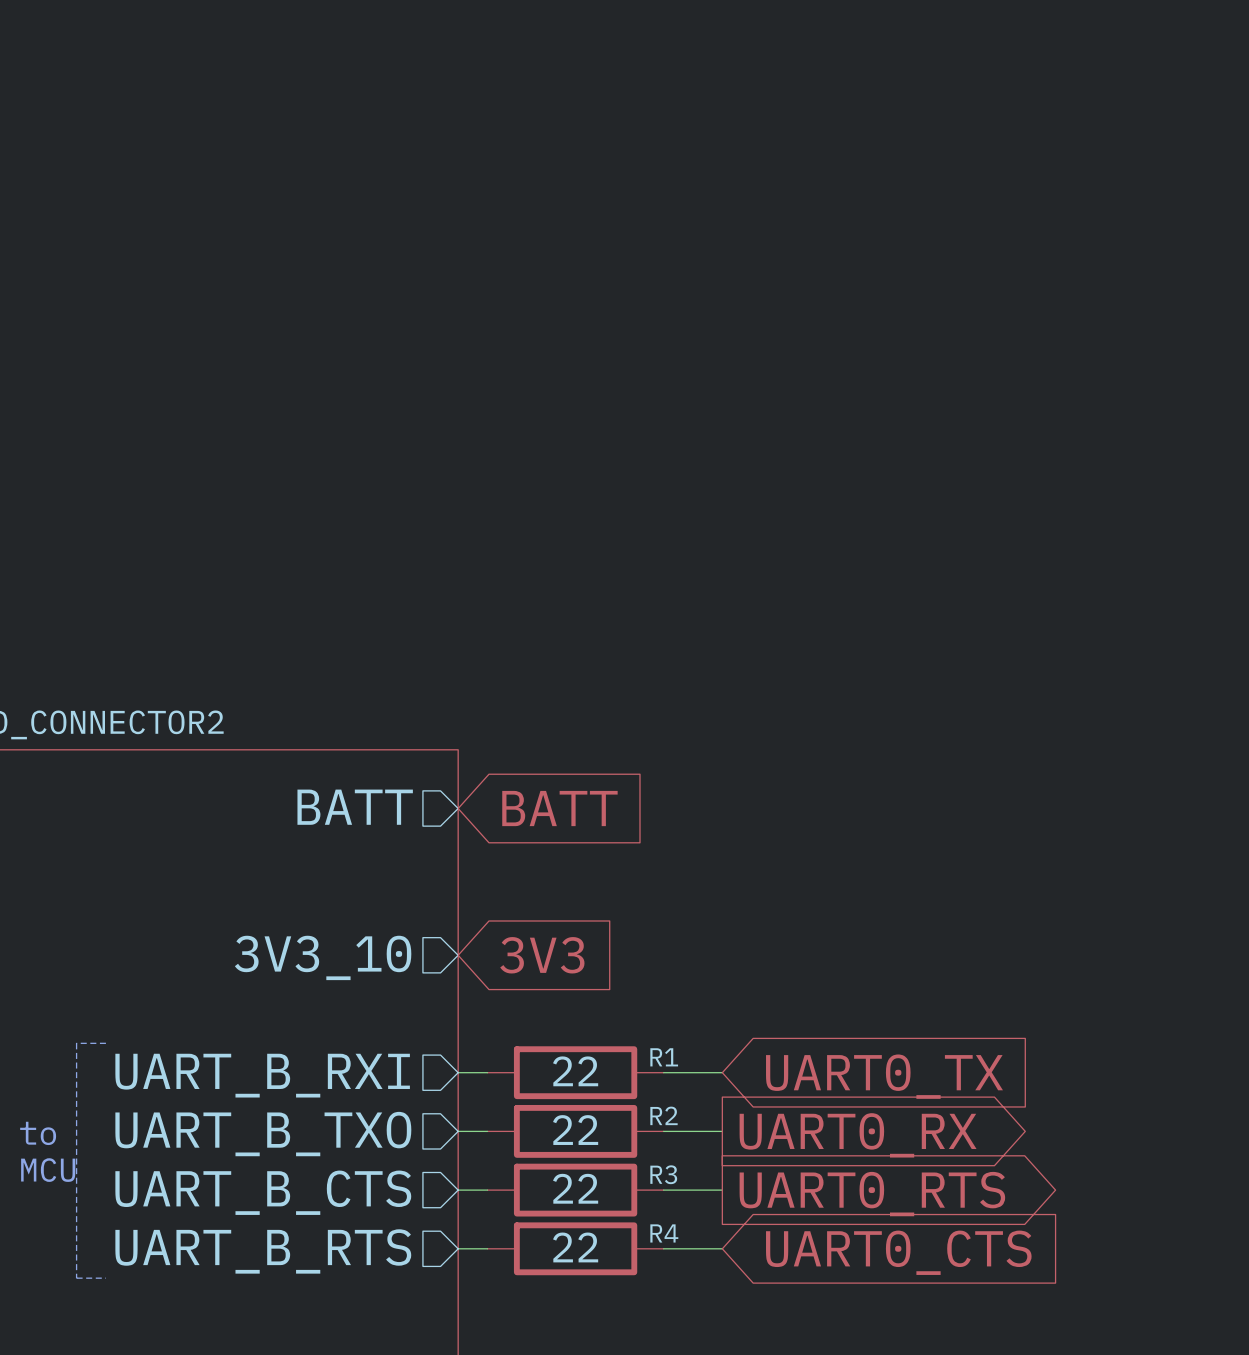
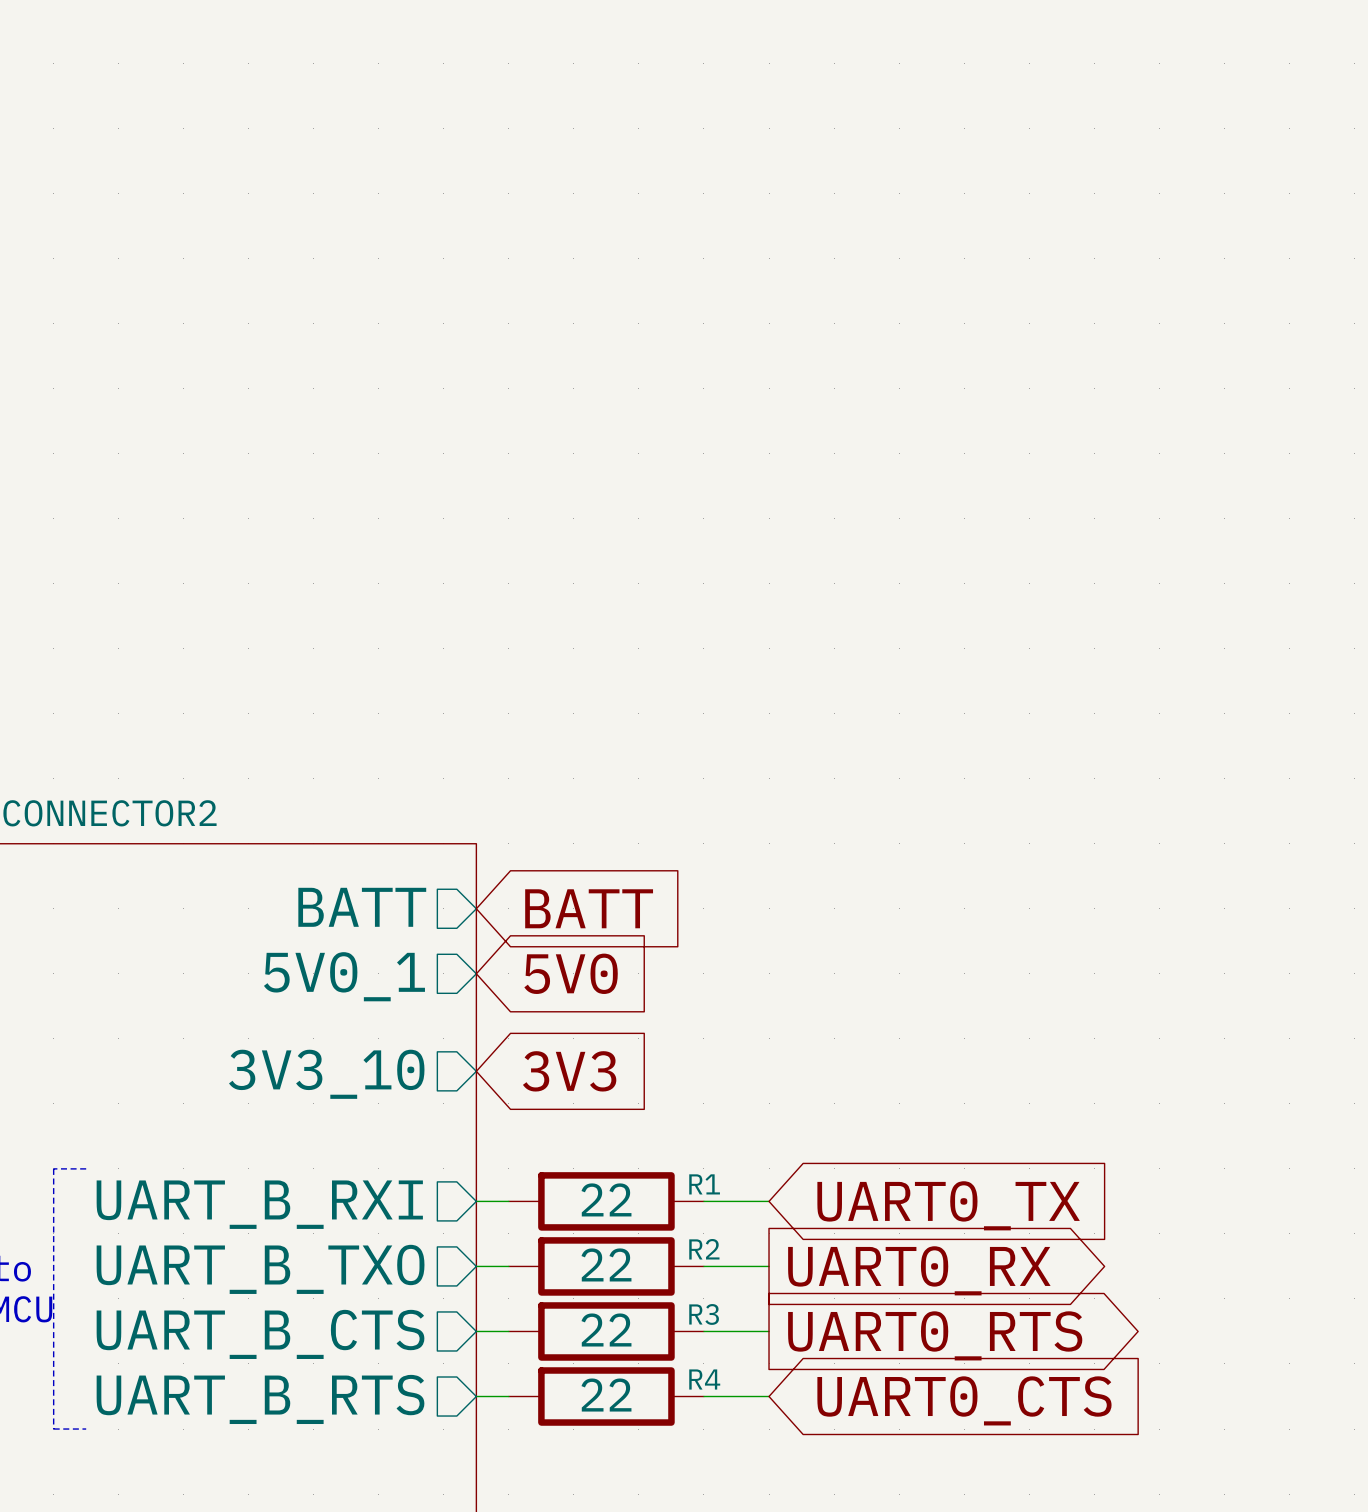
global label: none -> 5V0 (571, 973)
sheet pin: none -> 5V0_1 (344, 976)

